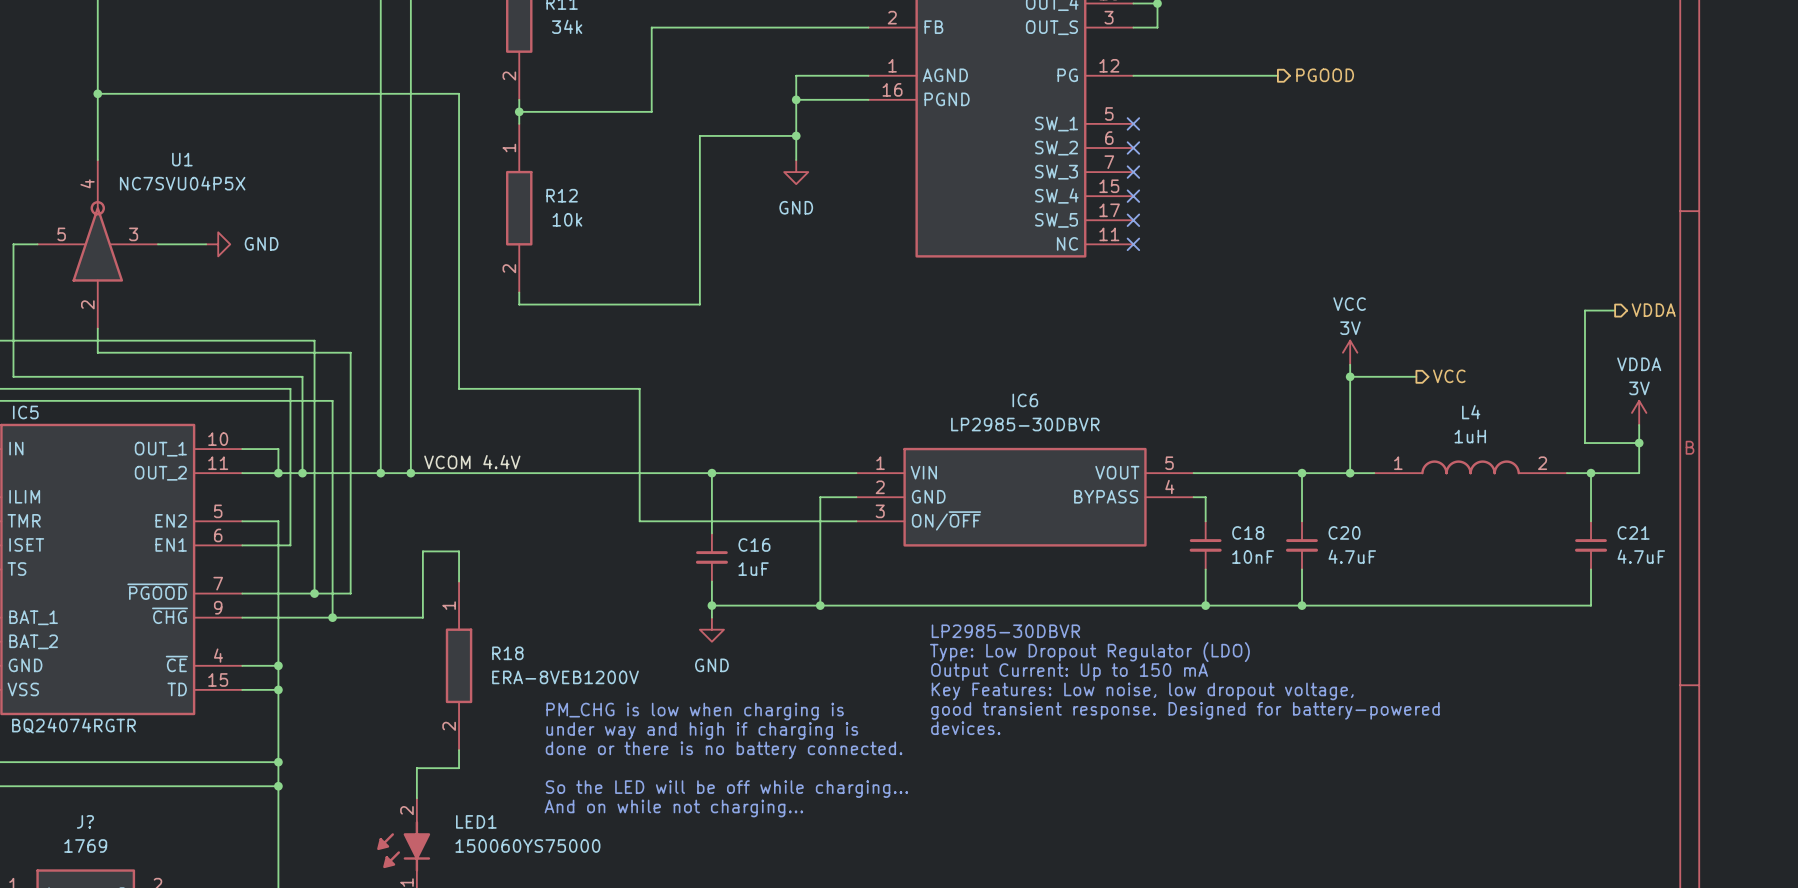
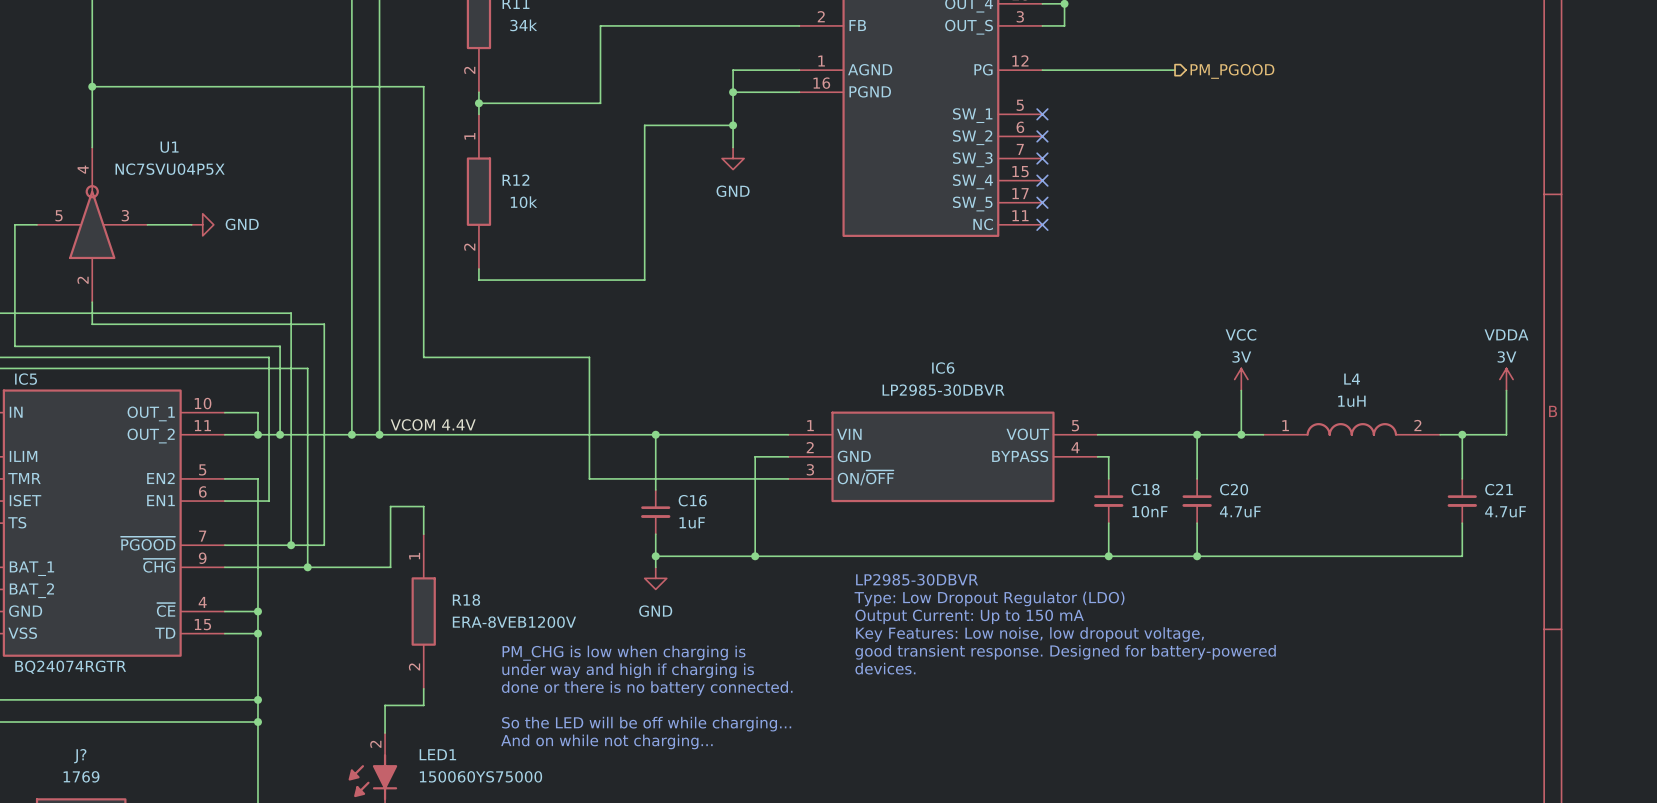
hierarchical label: PGOOD (1325, 75) -> PM_PGOOD (1232, 71)
wire: (1615, 310) (1584, 310) (1584, 443) (1639, 443) -> none
hierarchical label: VDDA (1653, 310) -> none
power symbol position: VCC (1350, 352) -> VCC (1241, 379)
wire: (1350, 364) (1350, 424) -> none
wire: (1350, 376) (1416, 376) -> none
junction: (1350, 376) -> none
hierarchical label: VCC (1449, 376) -> none
junction: (1639, 443) -> none

